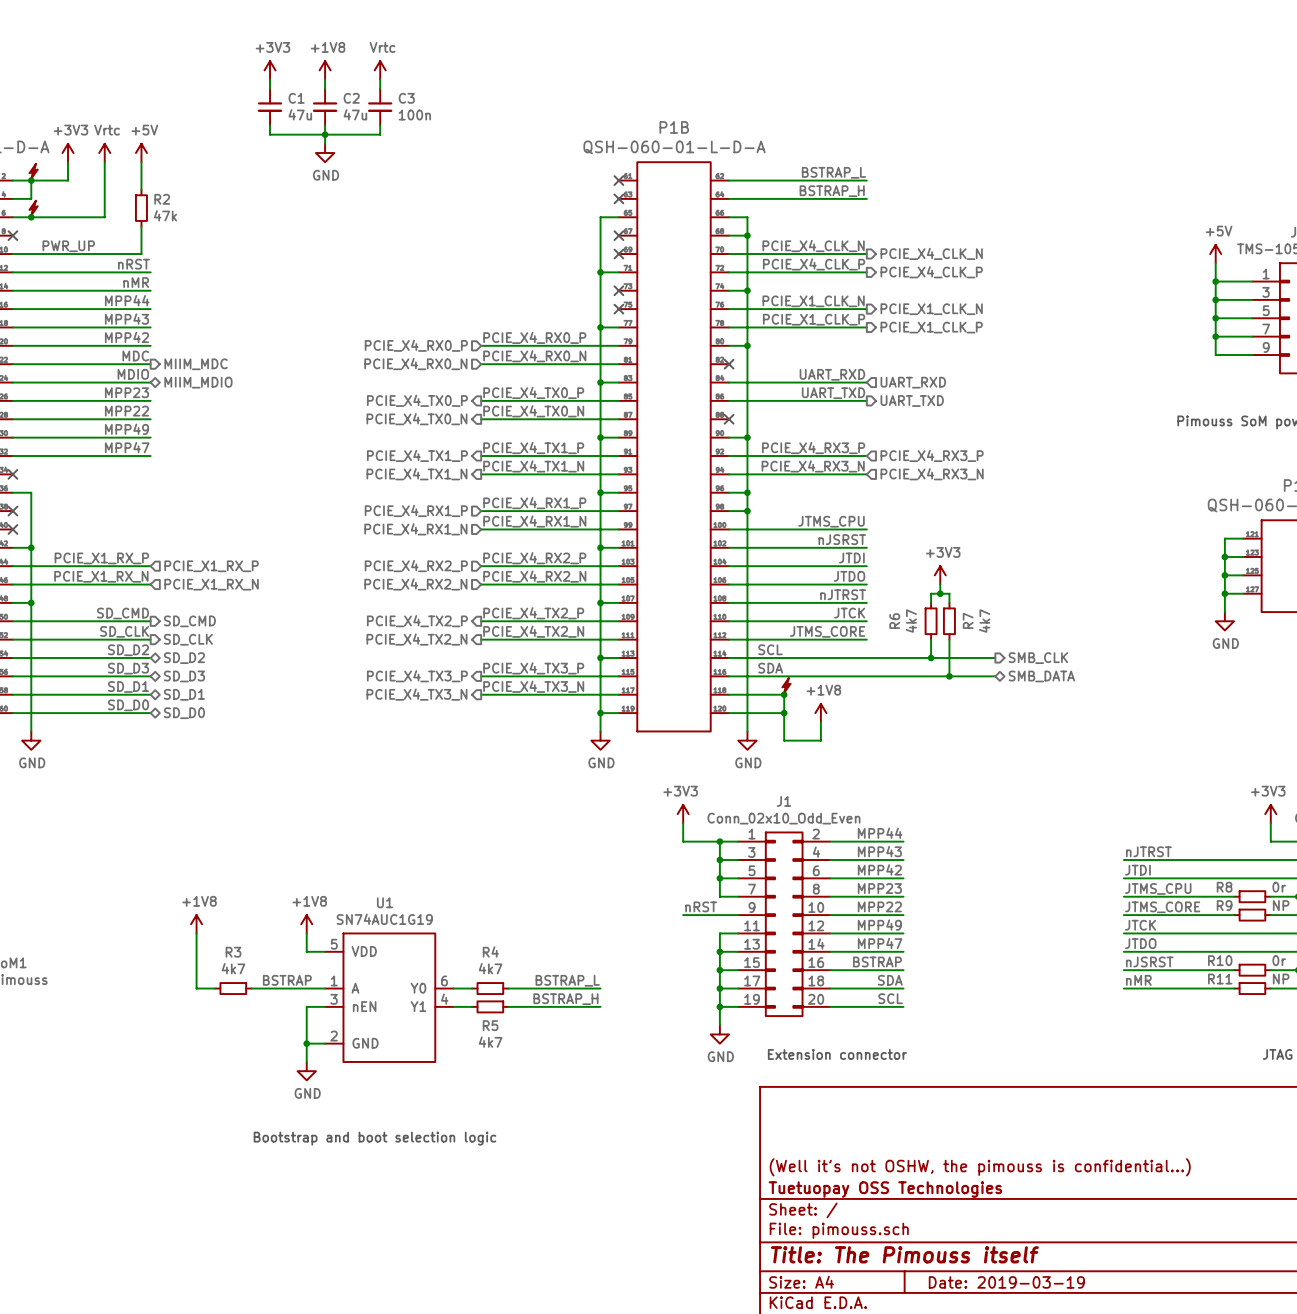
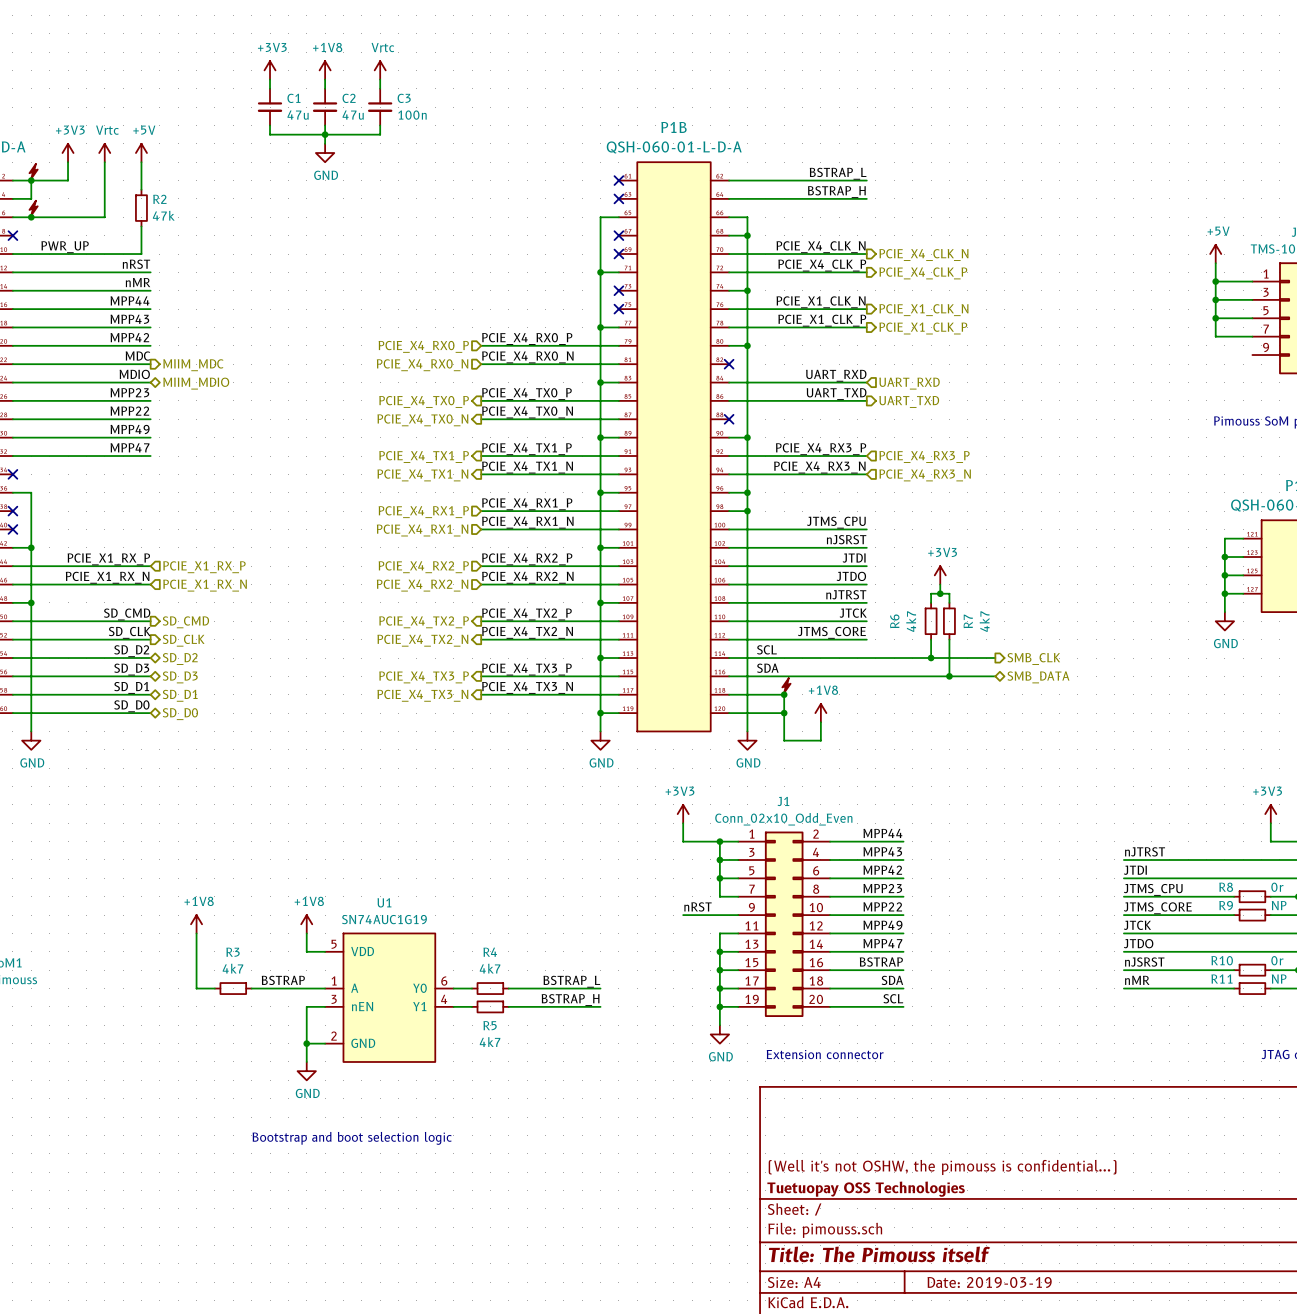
wire: (1215, 336) (1215, 355) (1252, 355) -> none
junction: (1215, 336) -> none

